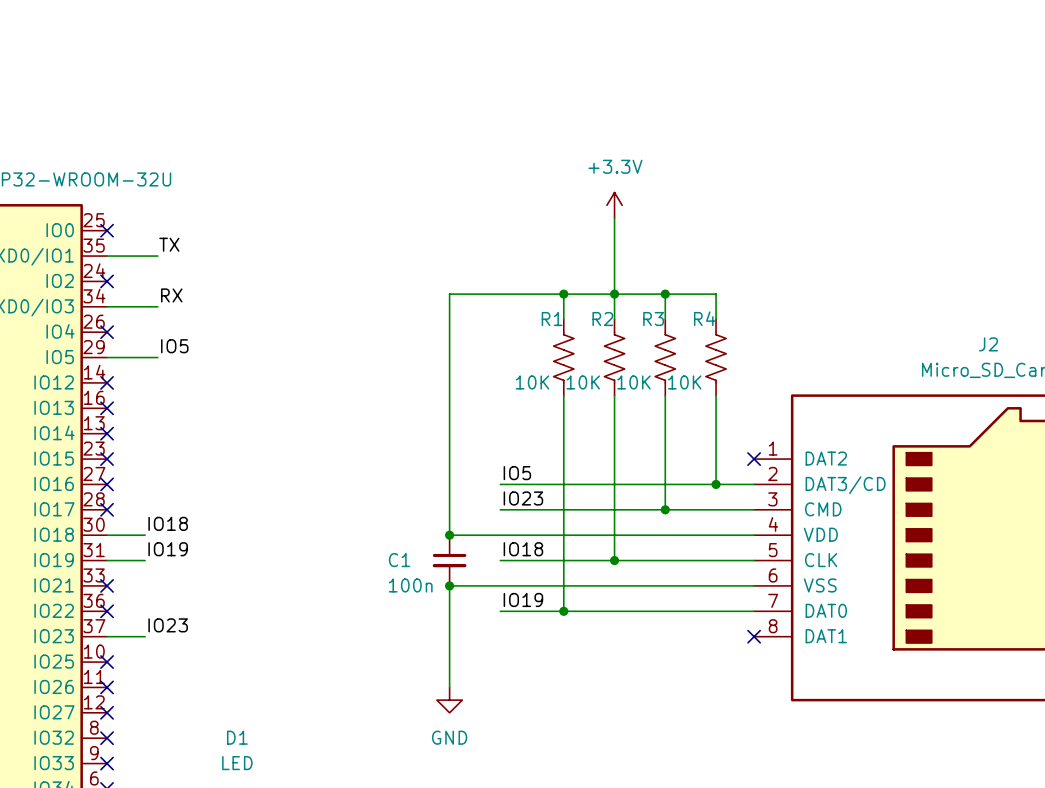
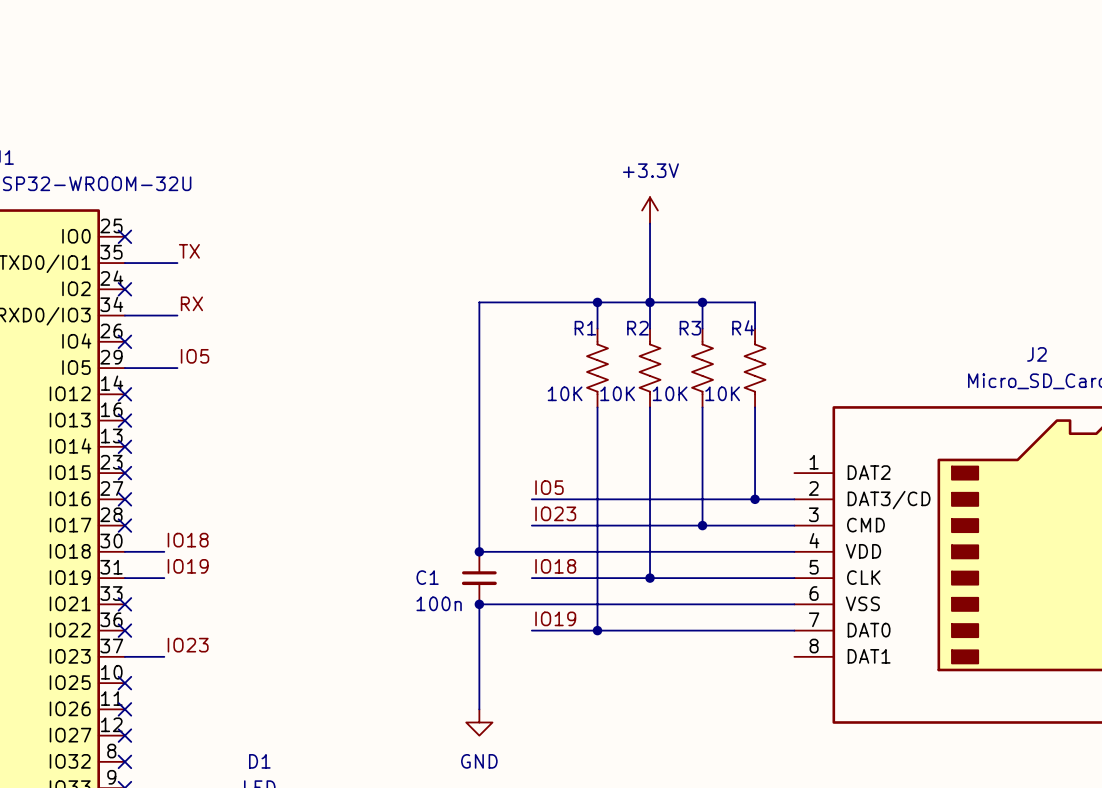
no-connect mark: (754, 459) -> none
no-connect mark: (754, 636) -> none

